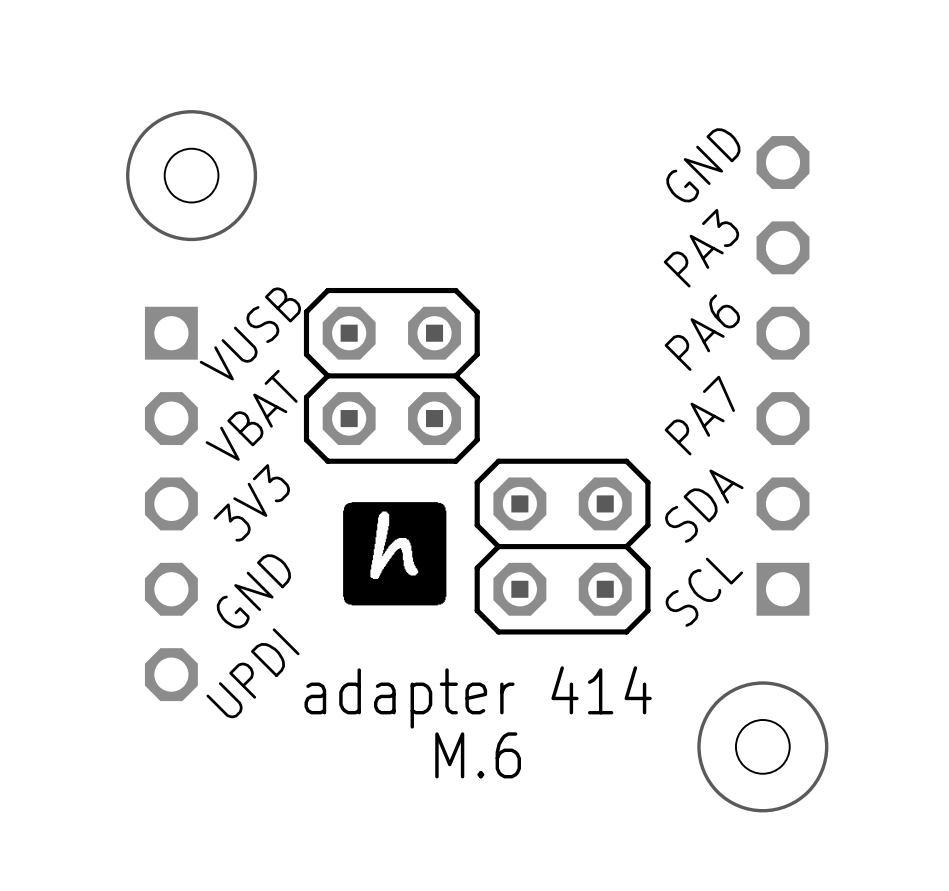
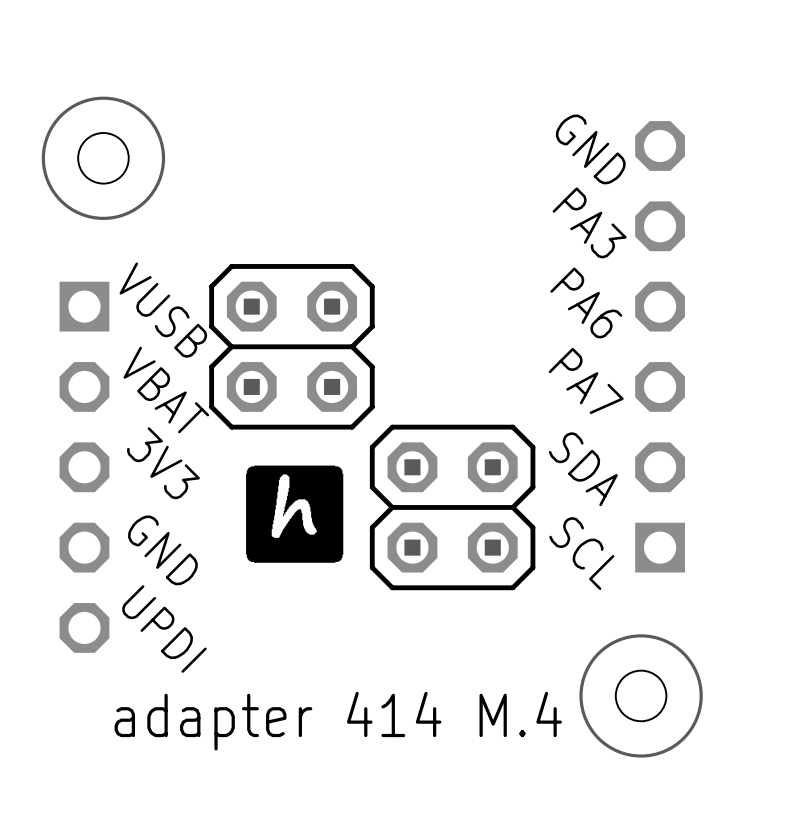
text rotation: 0° (703, 165) -> 90° clockwise (590, 149)
text rotation: 0° (701, 248) -> 90° clockwise (589, 222)
text rotation: 0° (702, 332) -> 90° clockwise (586, 302)
text rotation: 0° (250, 333) -> 90° clockwise (163, 310)
text rotation: 0° (251, 415) -> 90° clockwise (166, 389)
text rotation: 0° (699, 415) -> 90° clockwise (586, 380)
text rotation: 0° (251, 502) -> 90° clockwise (163, 463)
text rotation: 0° (704, 506) -> 90° clockwise (583, 469)
text rotation: 0° (253, 591) -> 90° clockwise (162, 550)
text rotation: 0° (704, 592) -> 90° clockwise (581, 553)
text rotation: 0° (253, 673) -> 90° clockwise (164, 629)
text: adapter 414 (478, 697) -> adapter 414 M.4 (338, 721)
text: M.6 (478, 755) -> none

